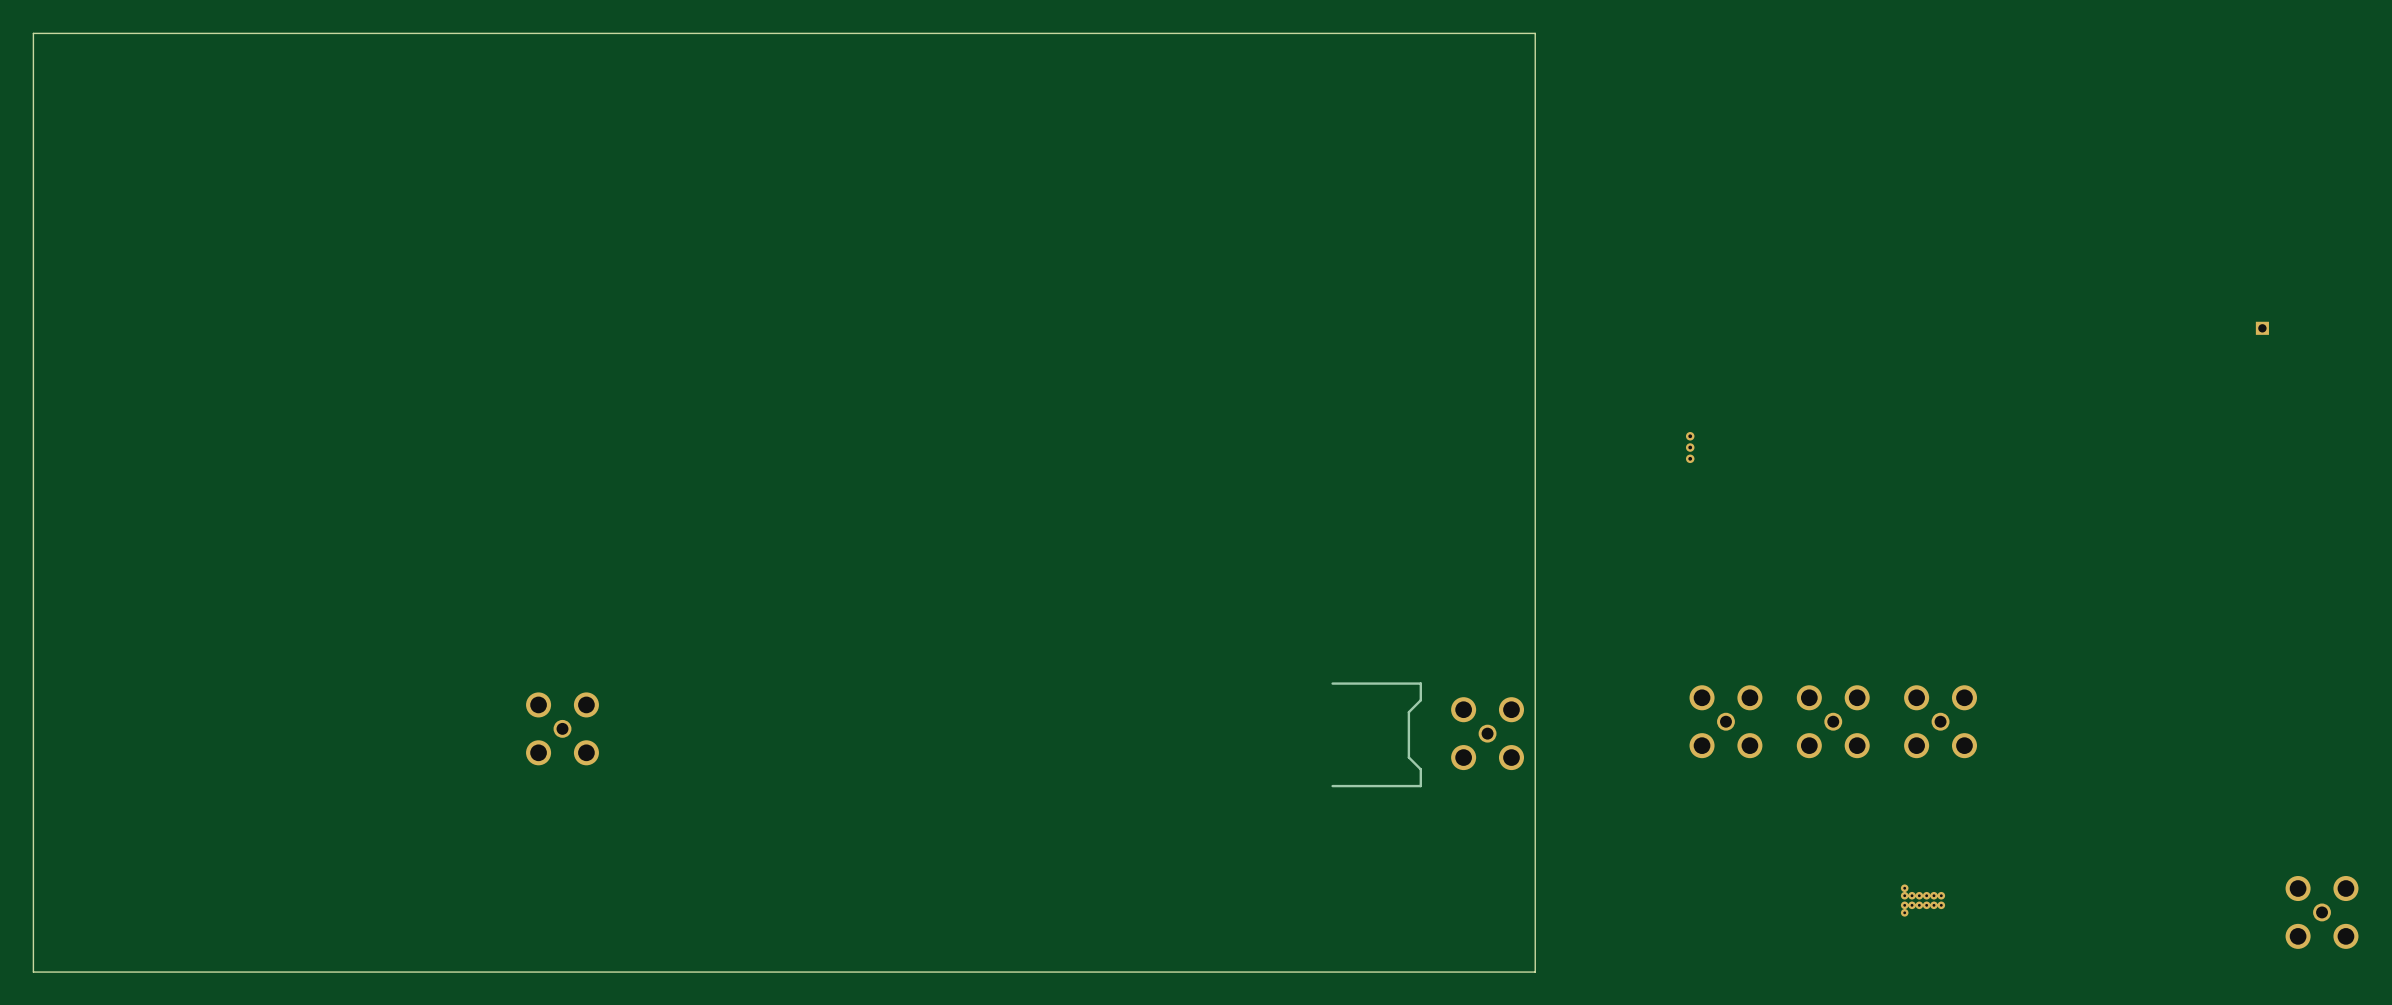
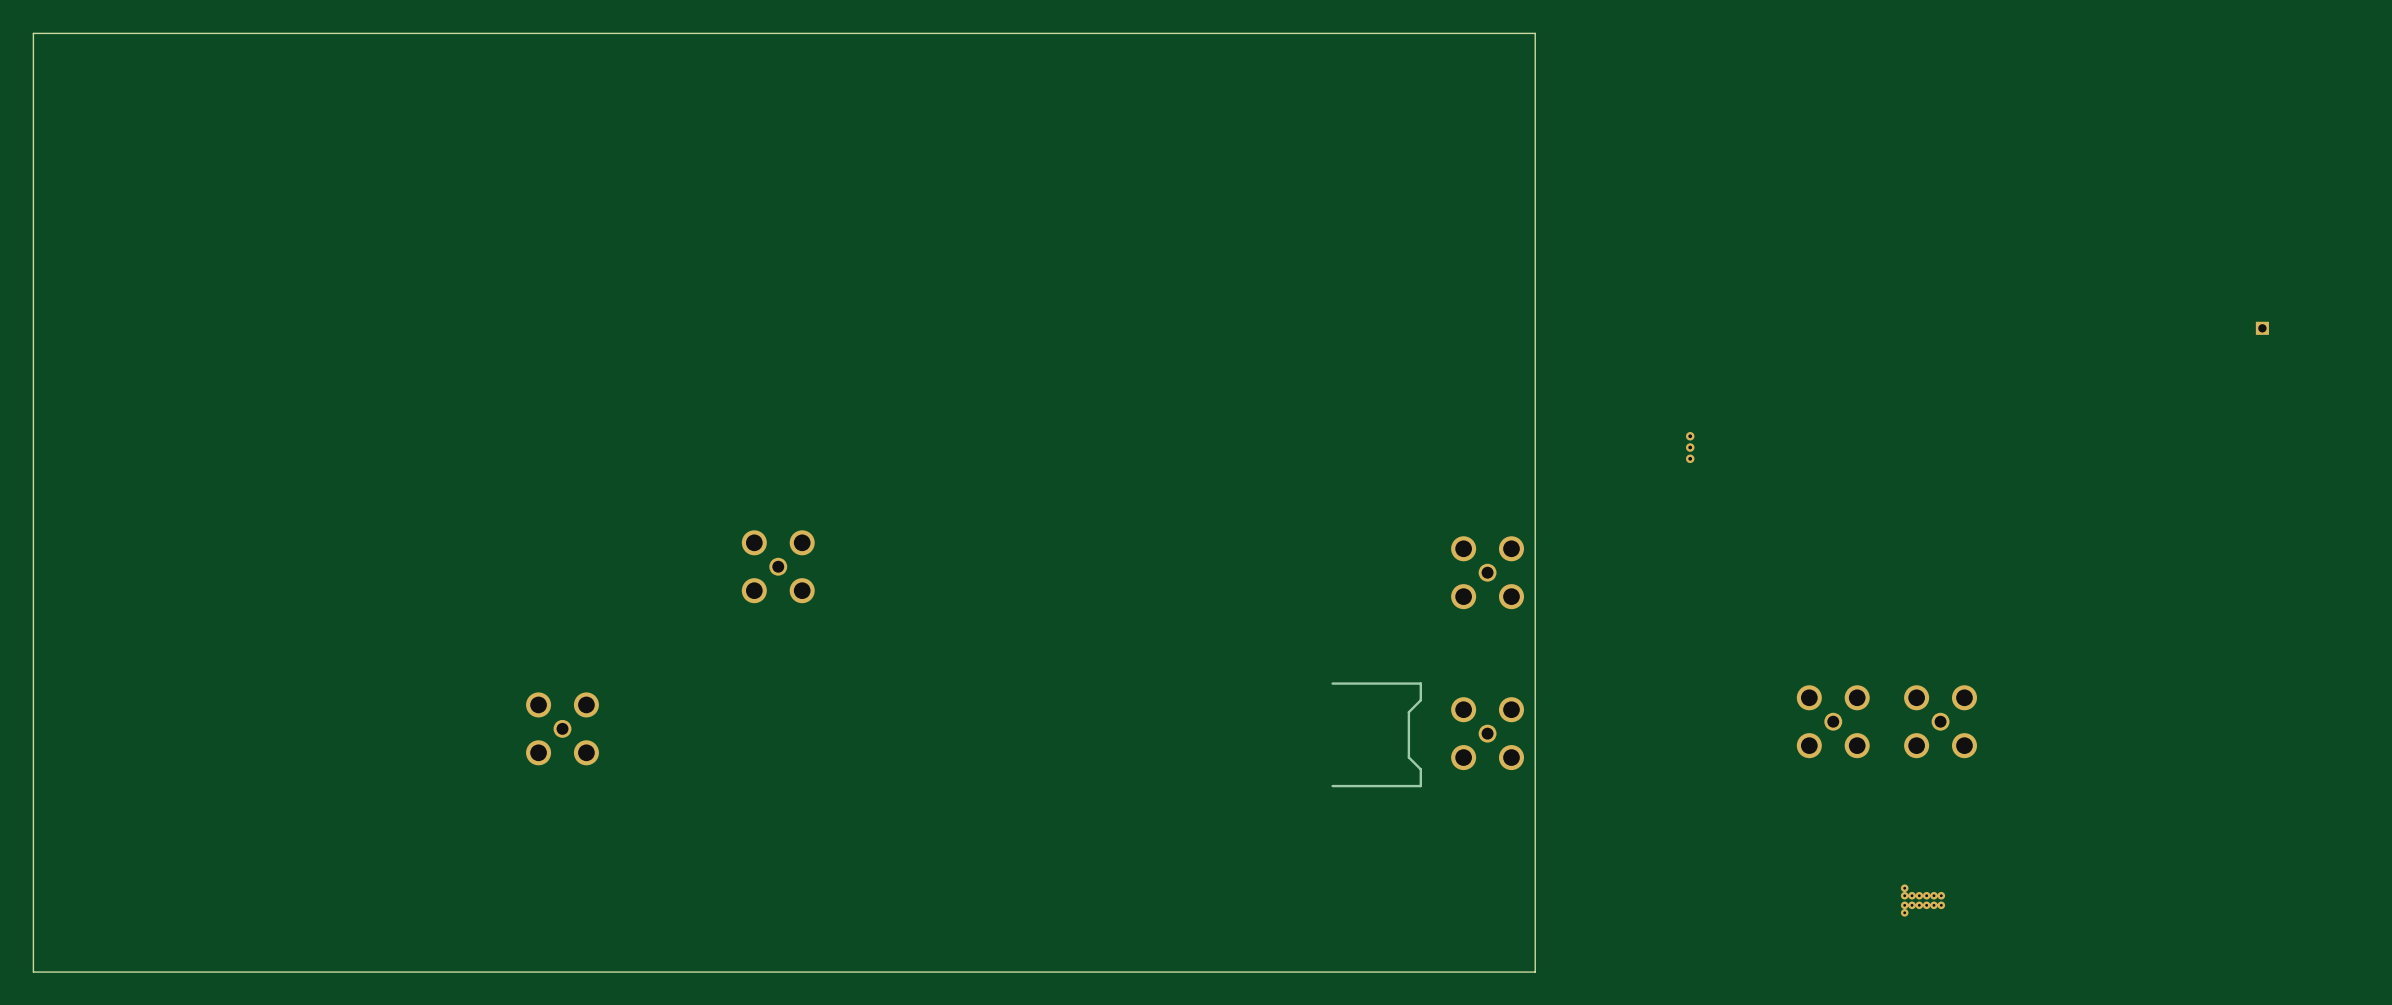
part: none -> (778, 566)
part: none -> (1487, 572)
part: (1725, 721) -> none
part: (2322, 912) -> none

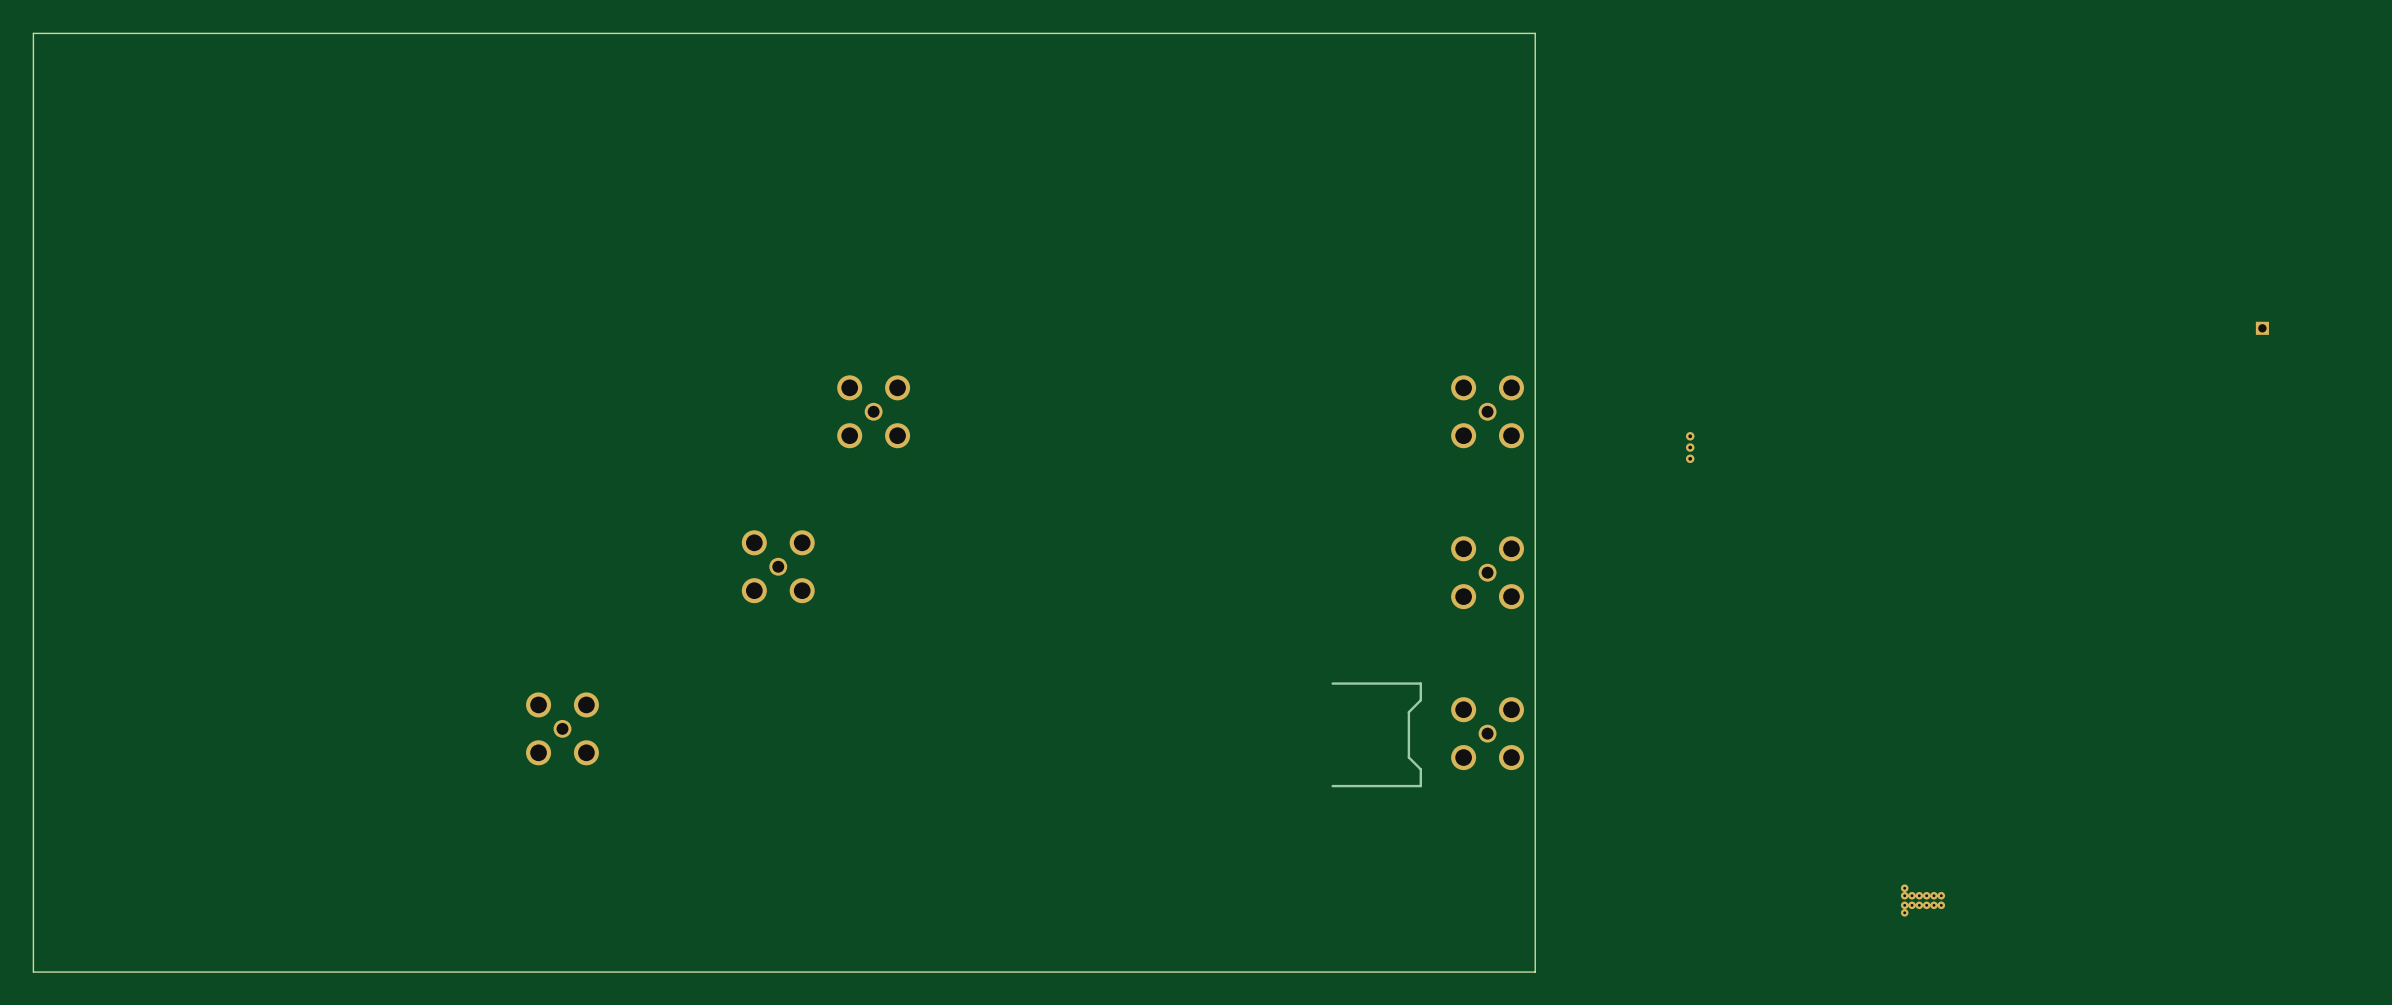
part: none -> (873, 411)
part: none -> (1487, 411)
part: (1833, 721) -> none
part: (1940, 721) -> none

